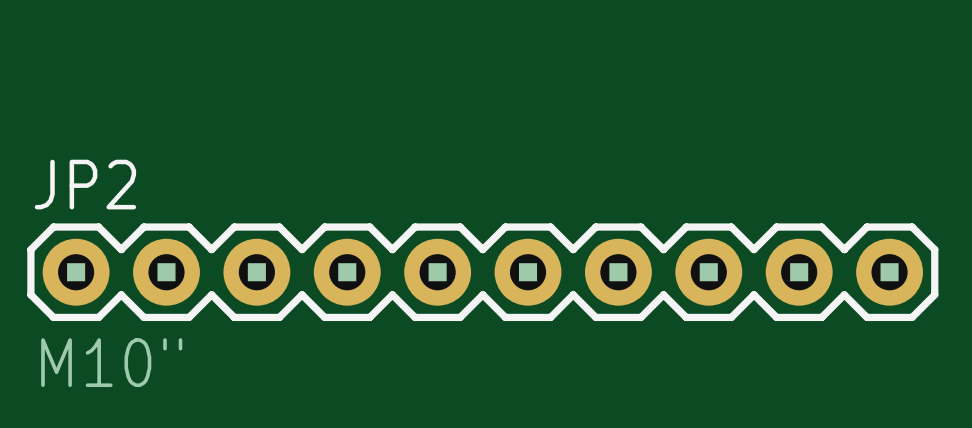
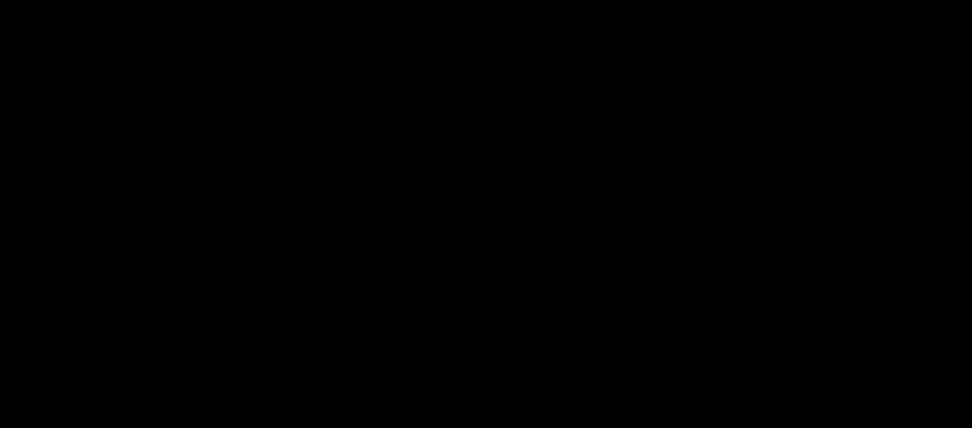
JP2: M10" (482, 272) -> none

